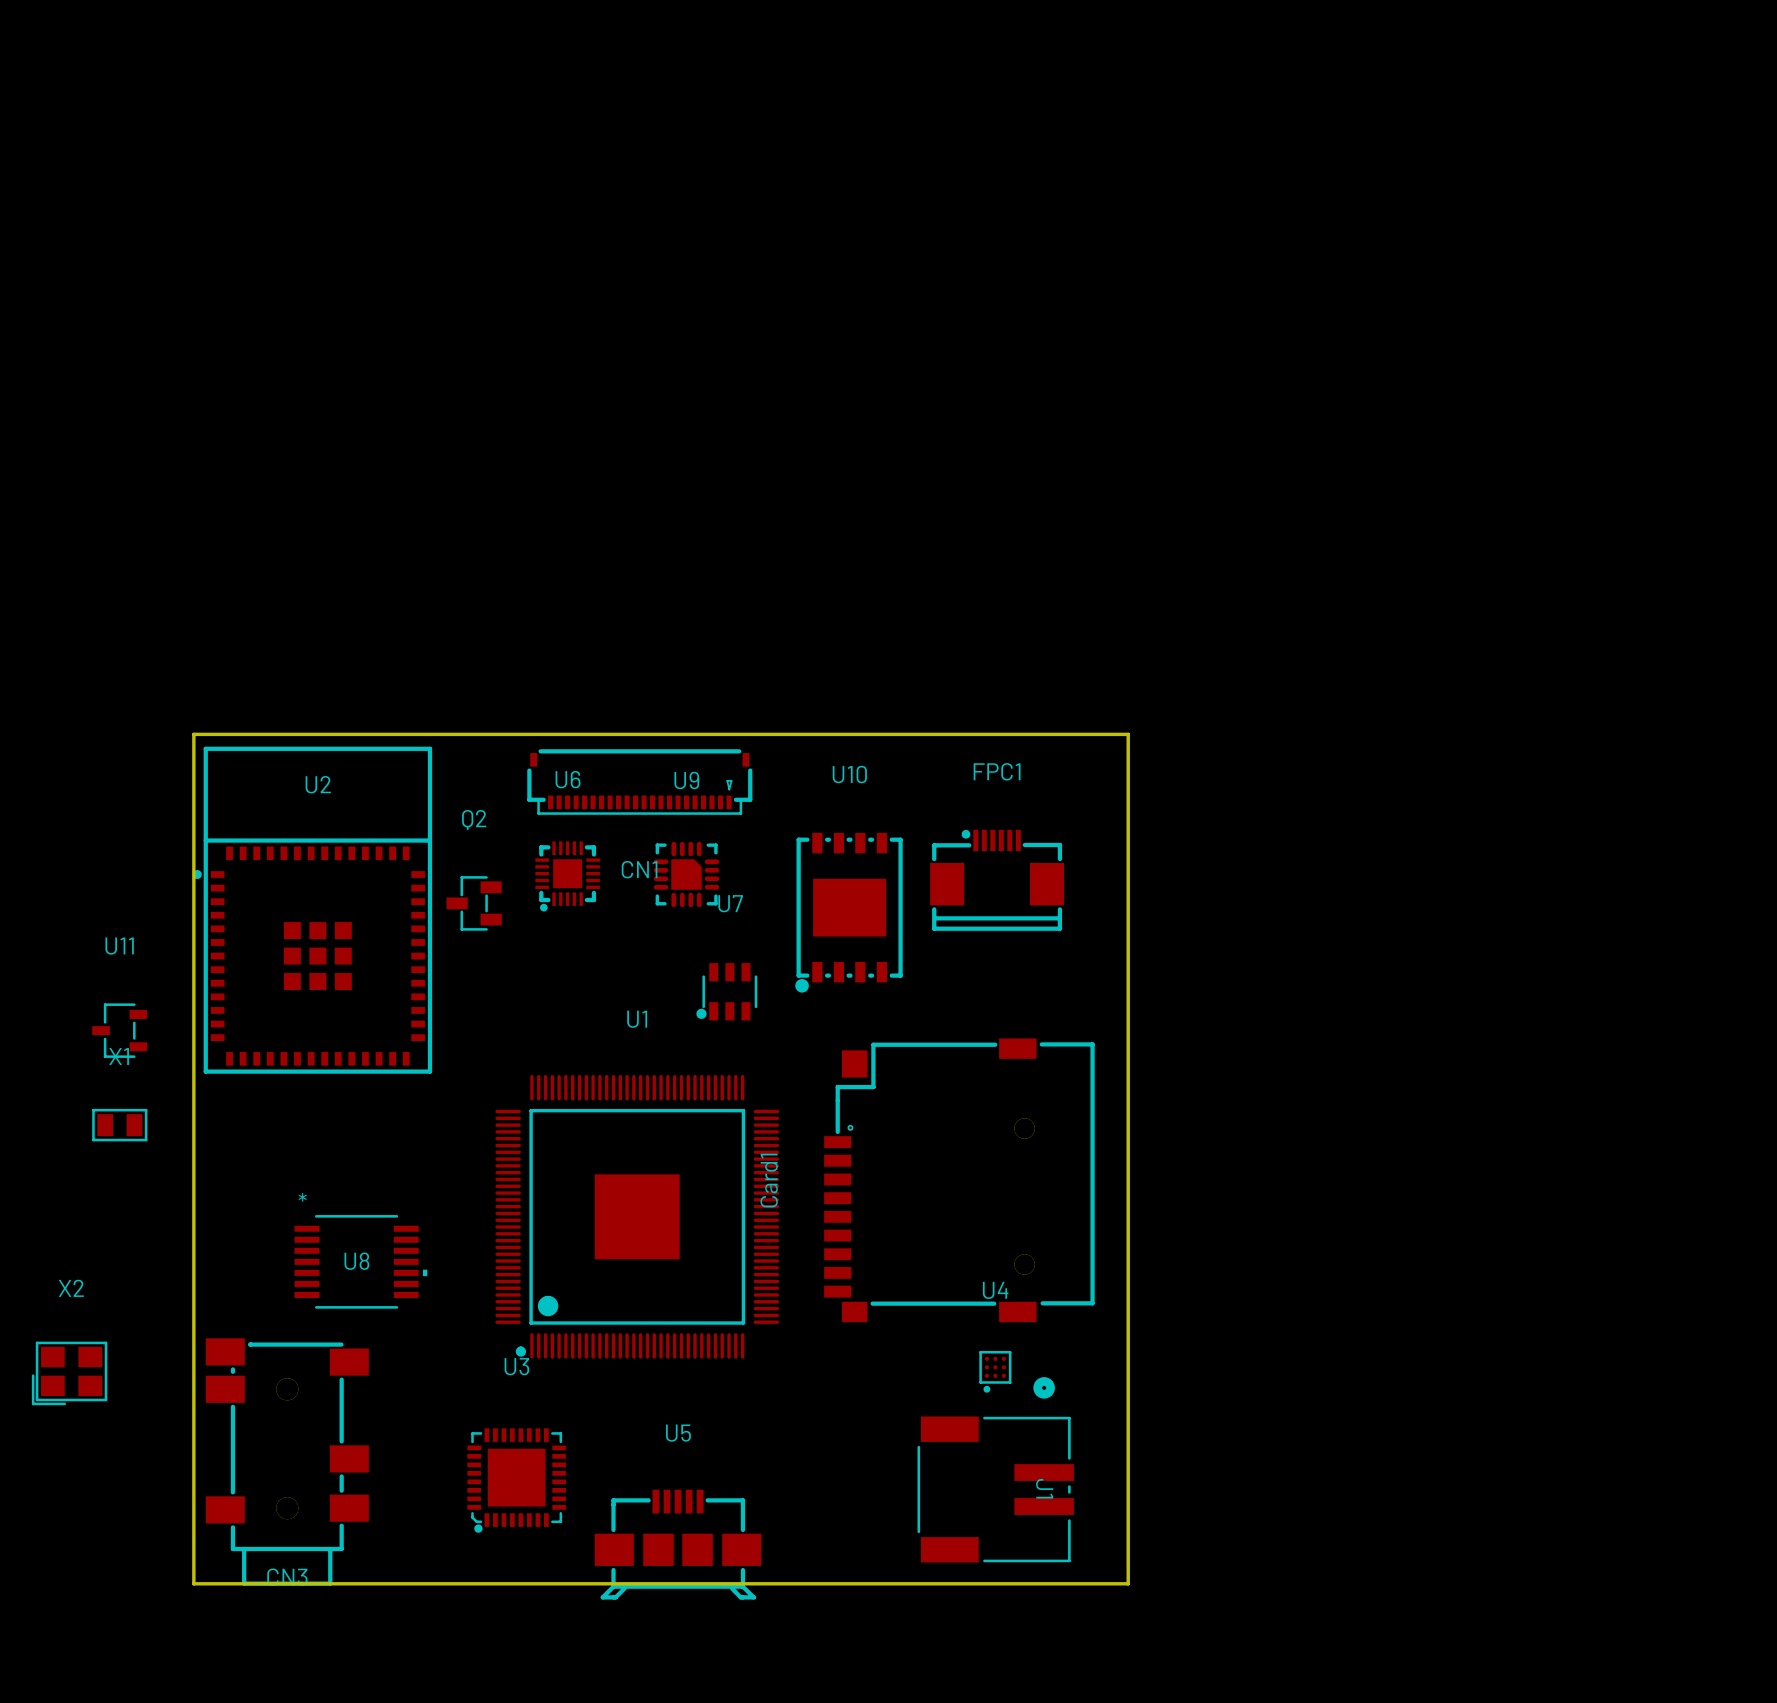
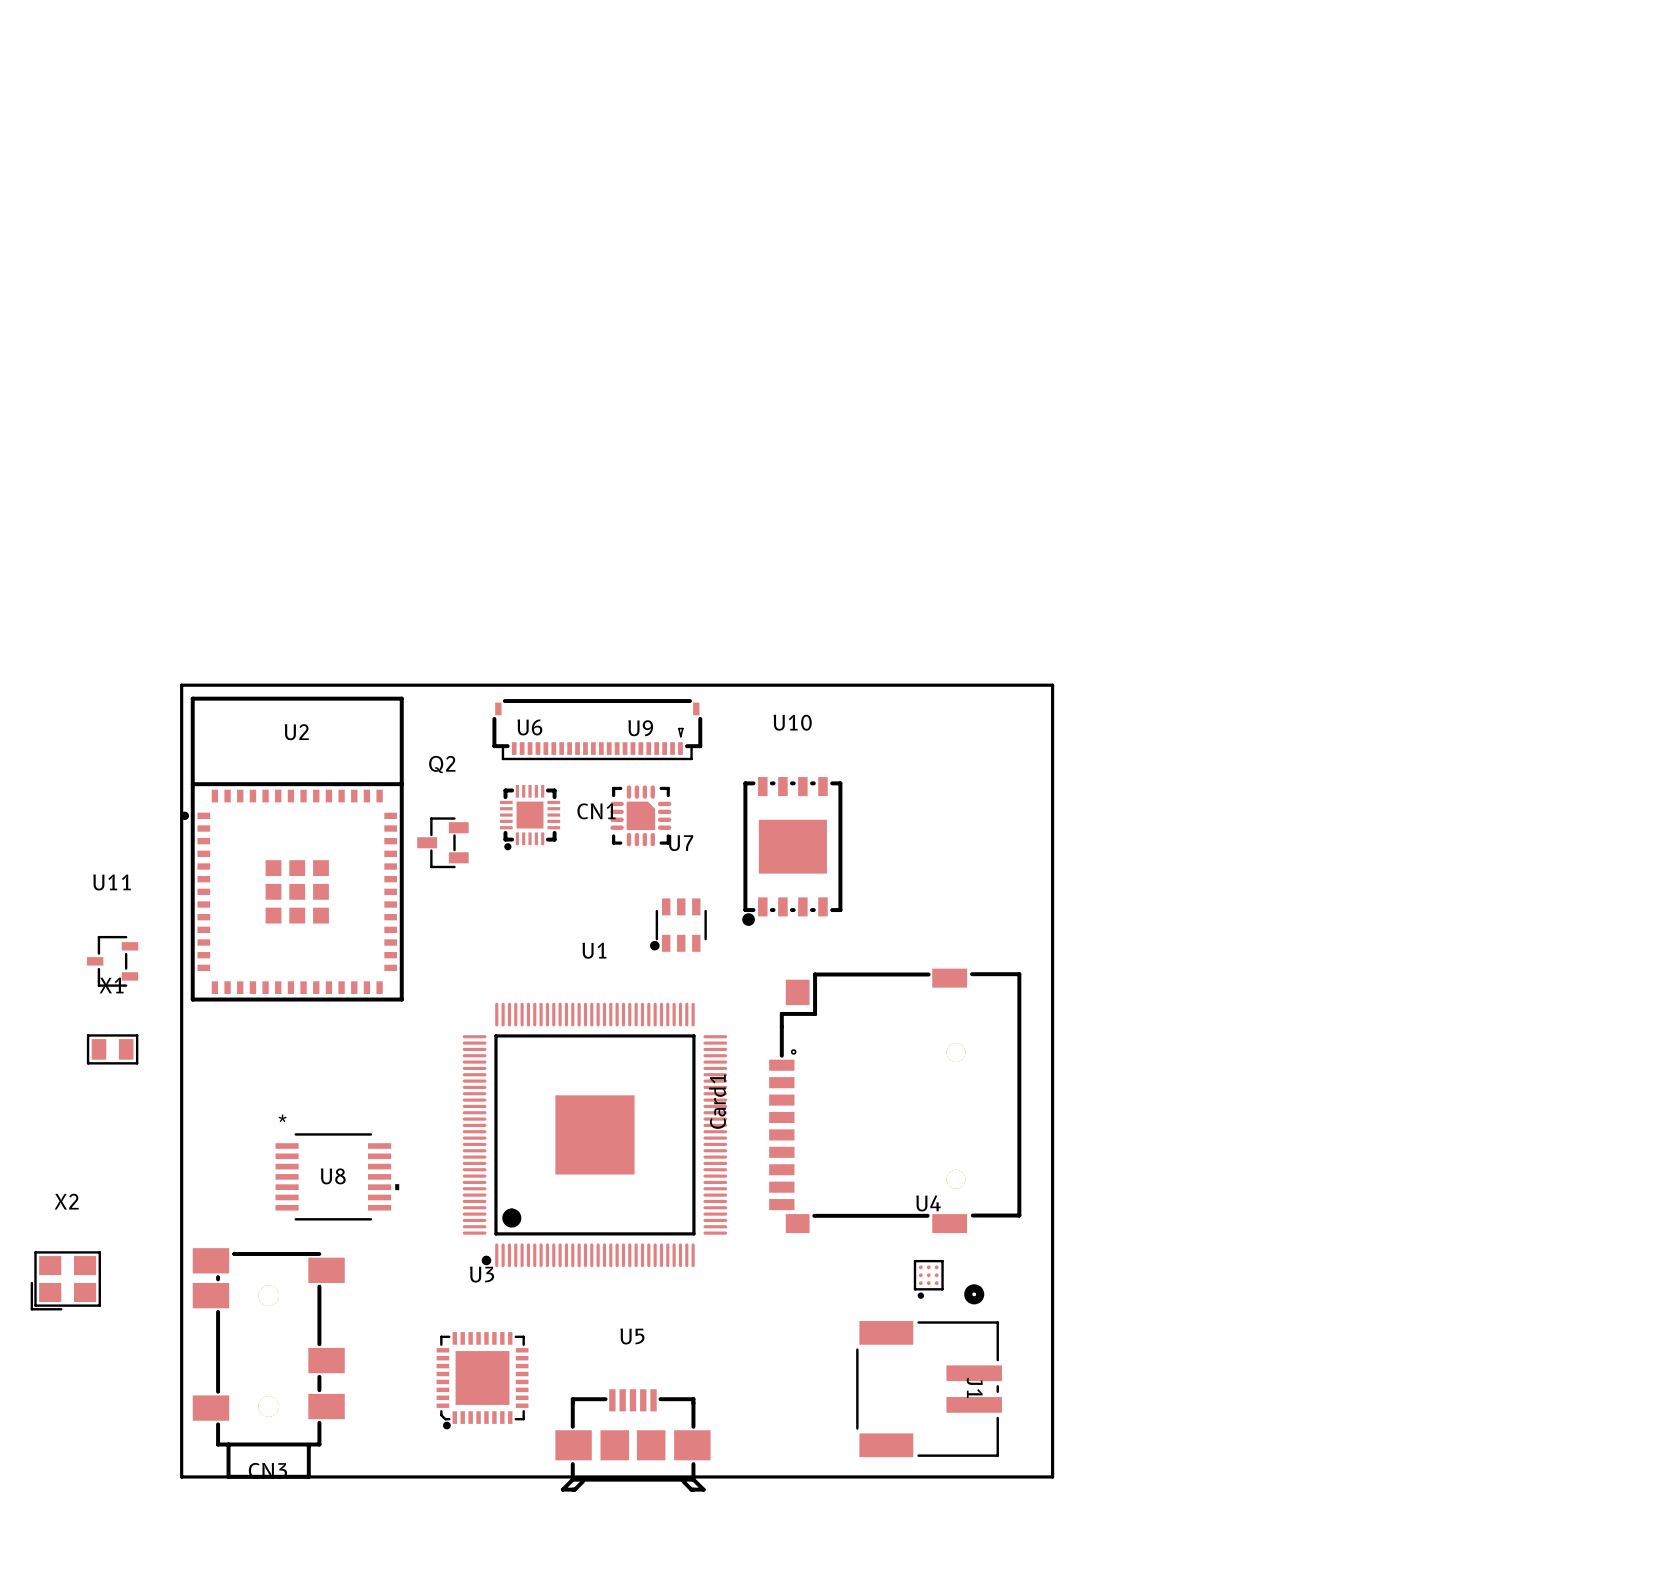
FPC1: (997, 880) -> none

